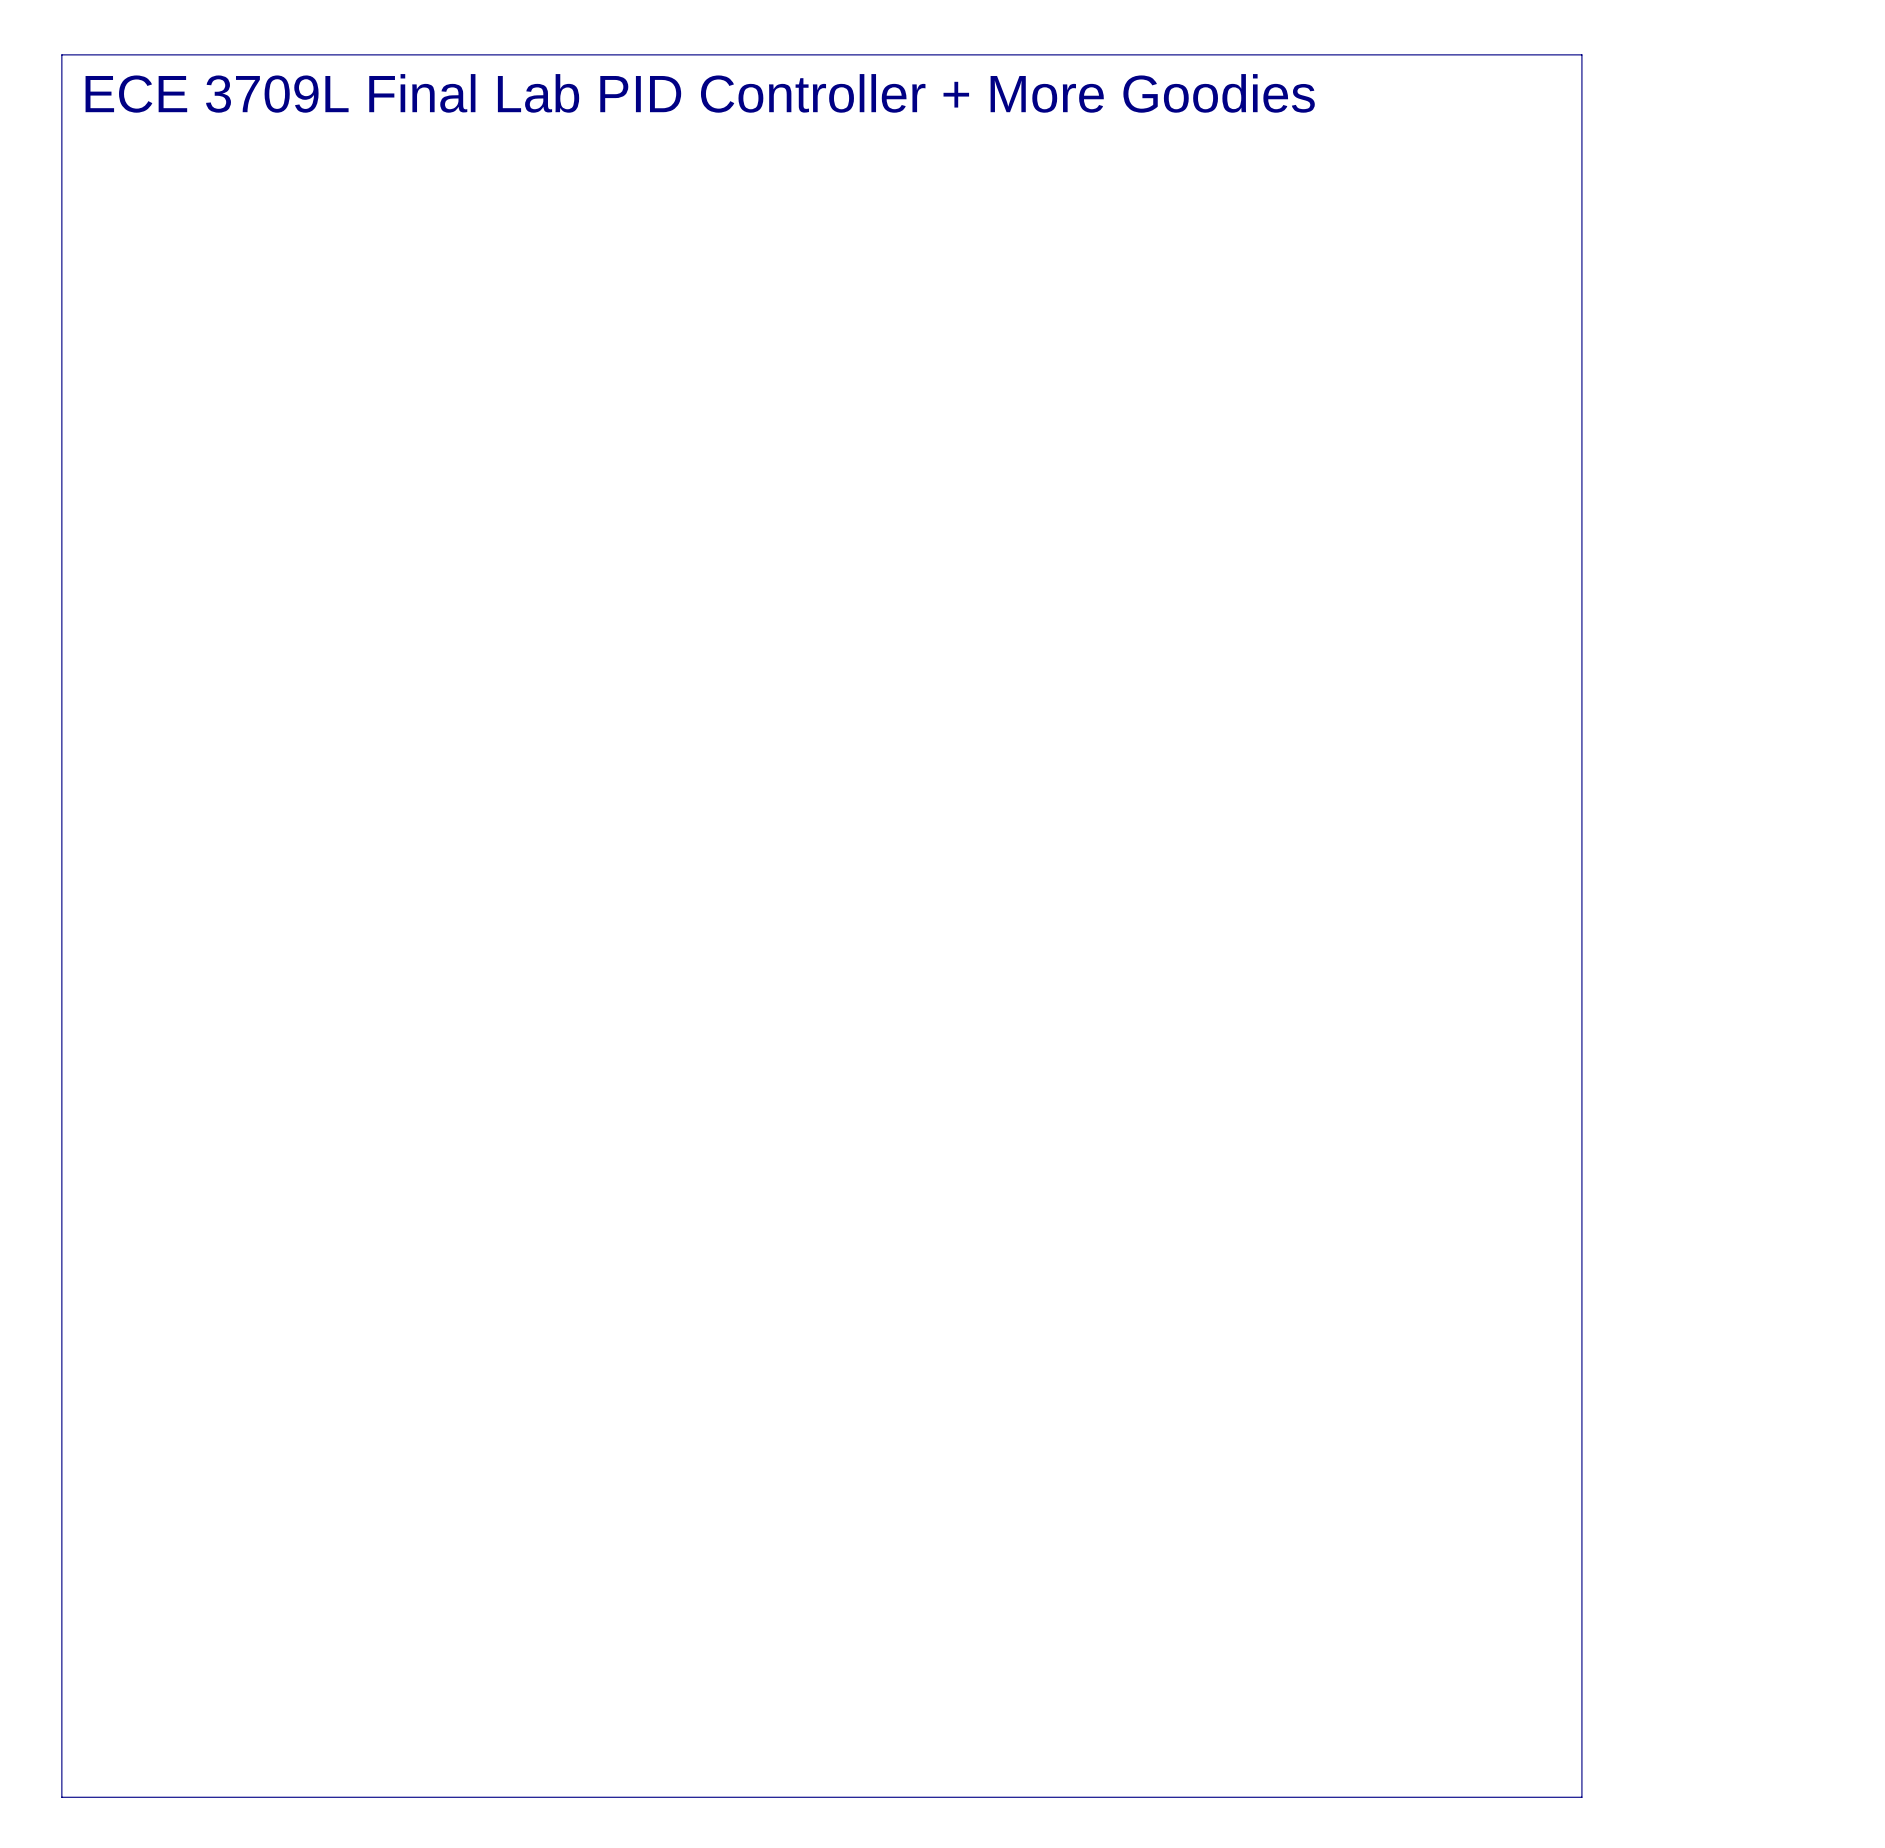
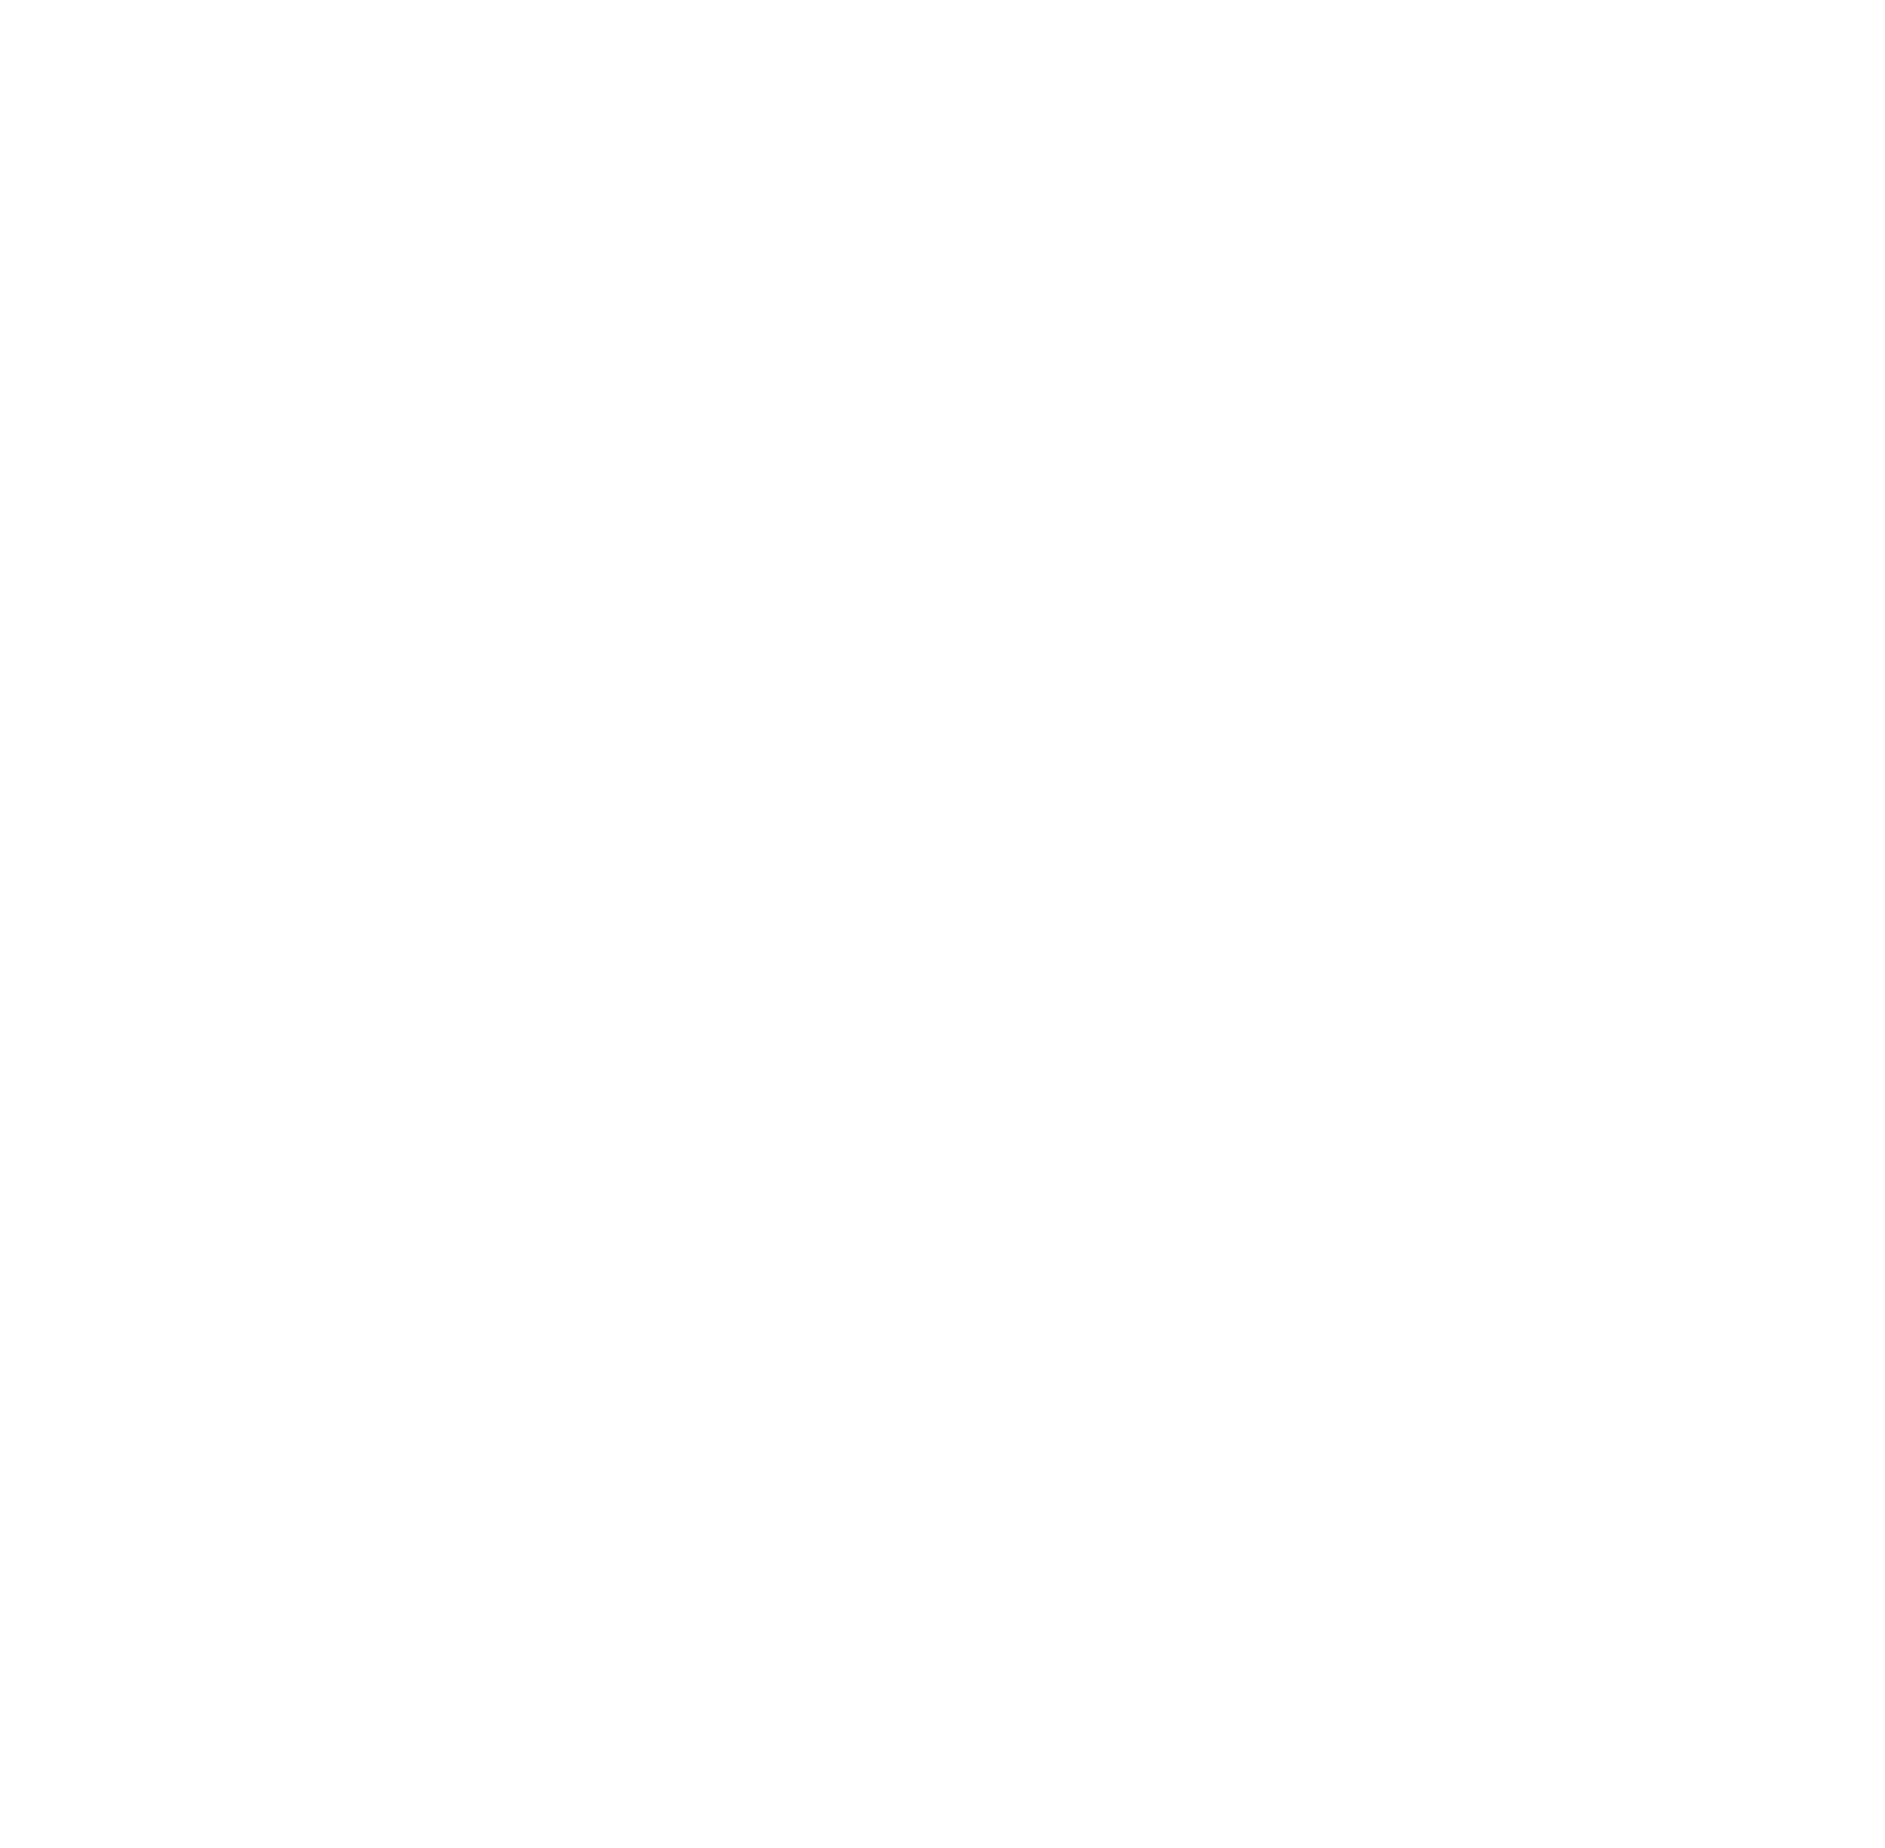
line: (61, 54) (1581, 54) (1581, 1797) (61, 1797) (61, 54) -> none
text: ECE 3709L Final Lab PID Controller + More Goodies (700, 93) -> none

